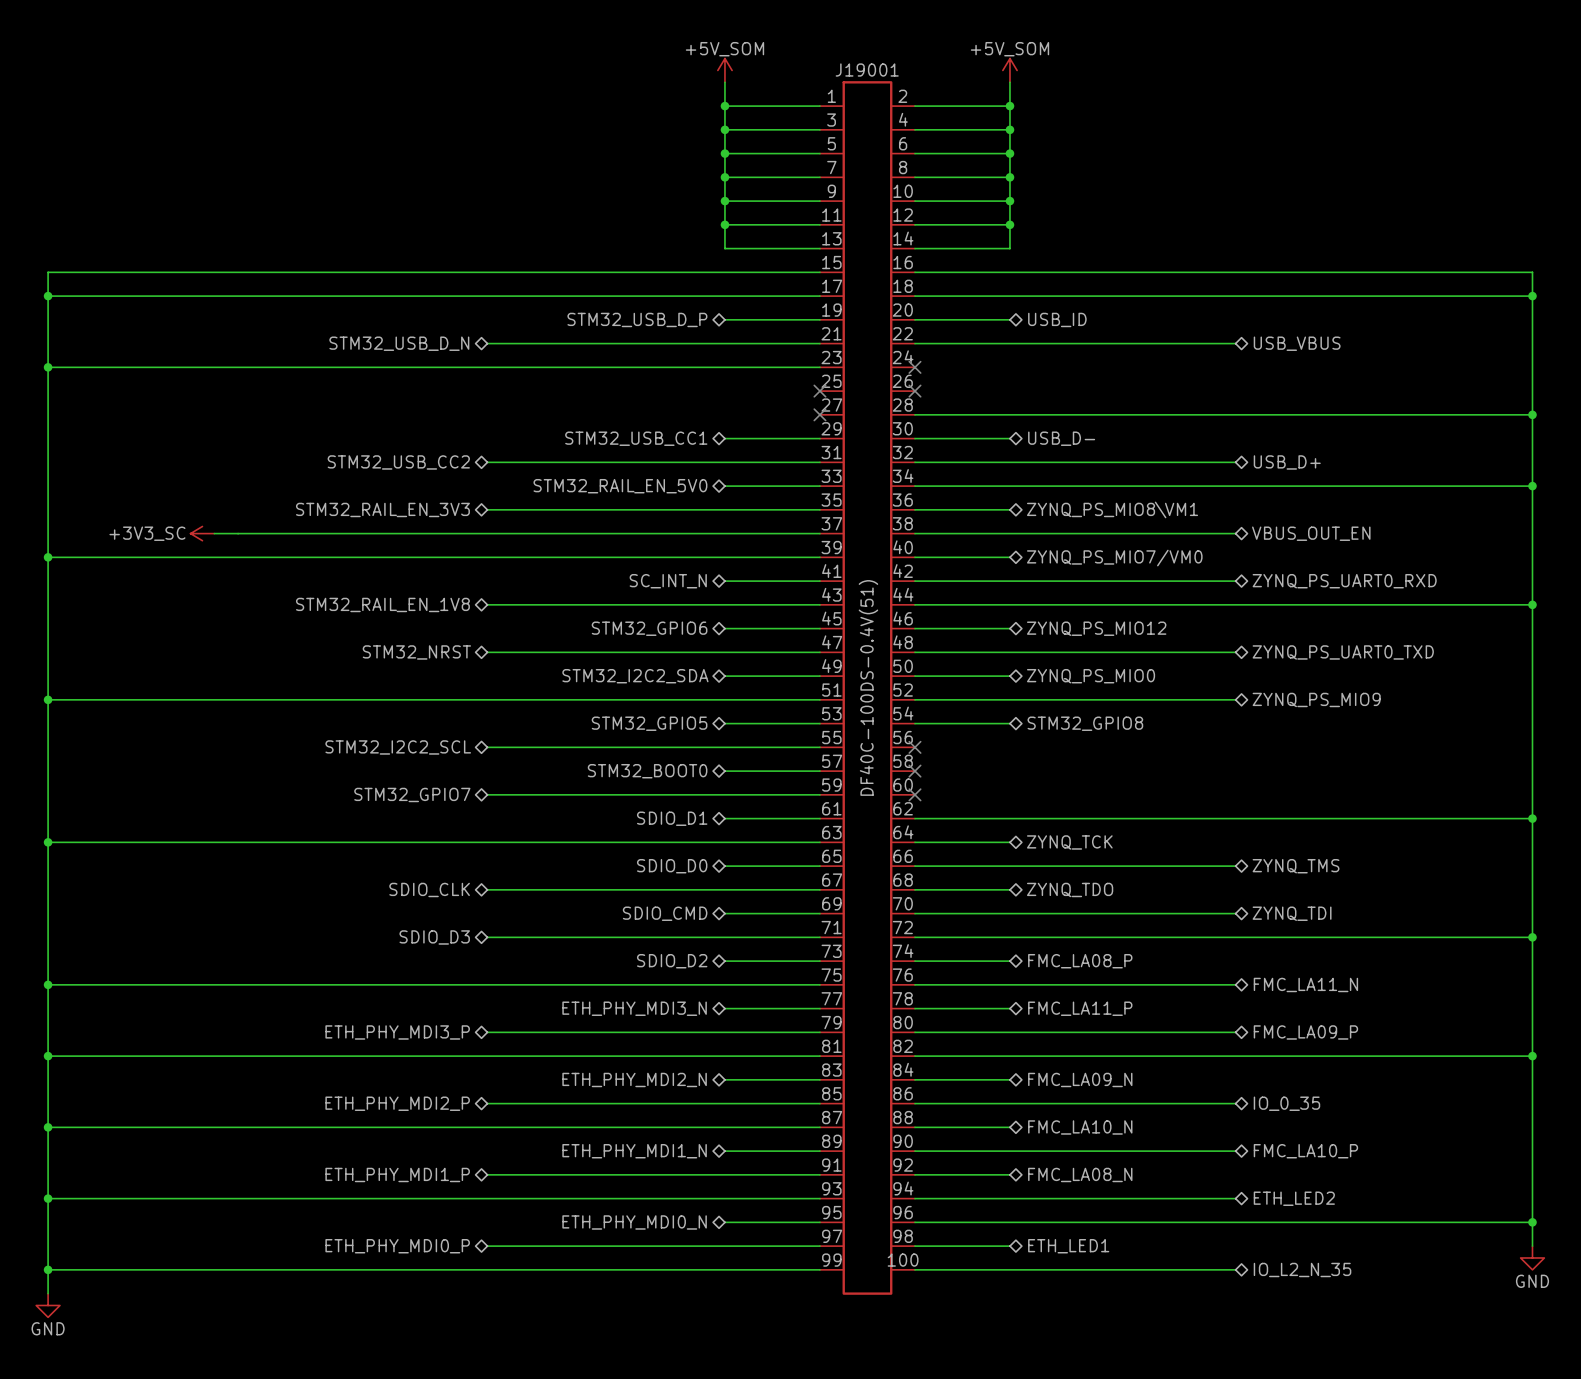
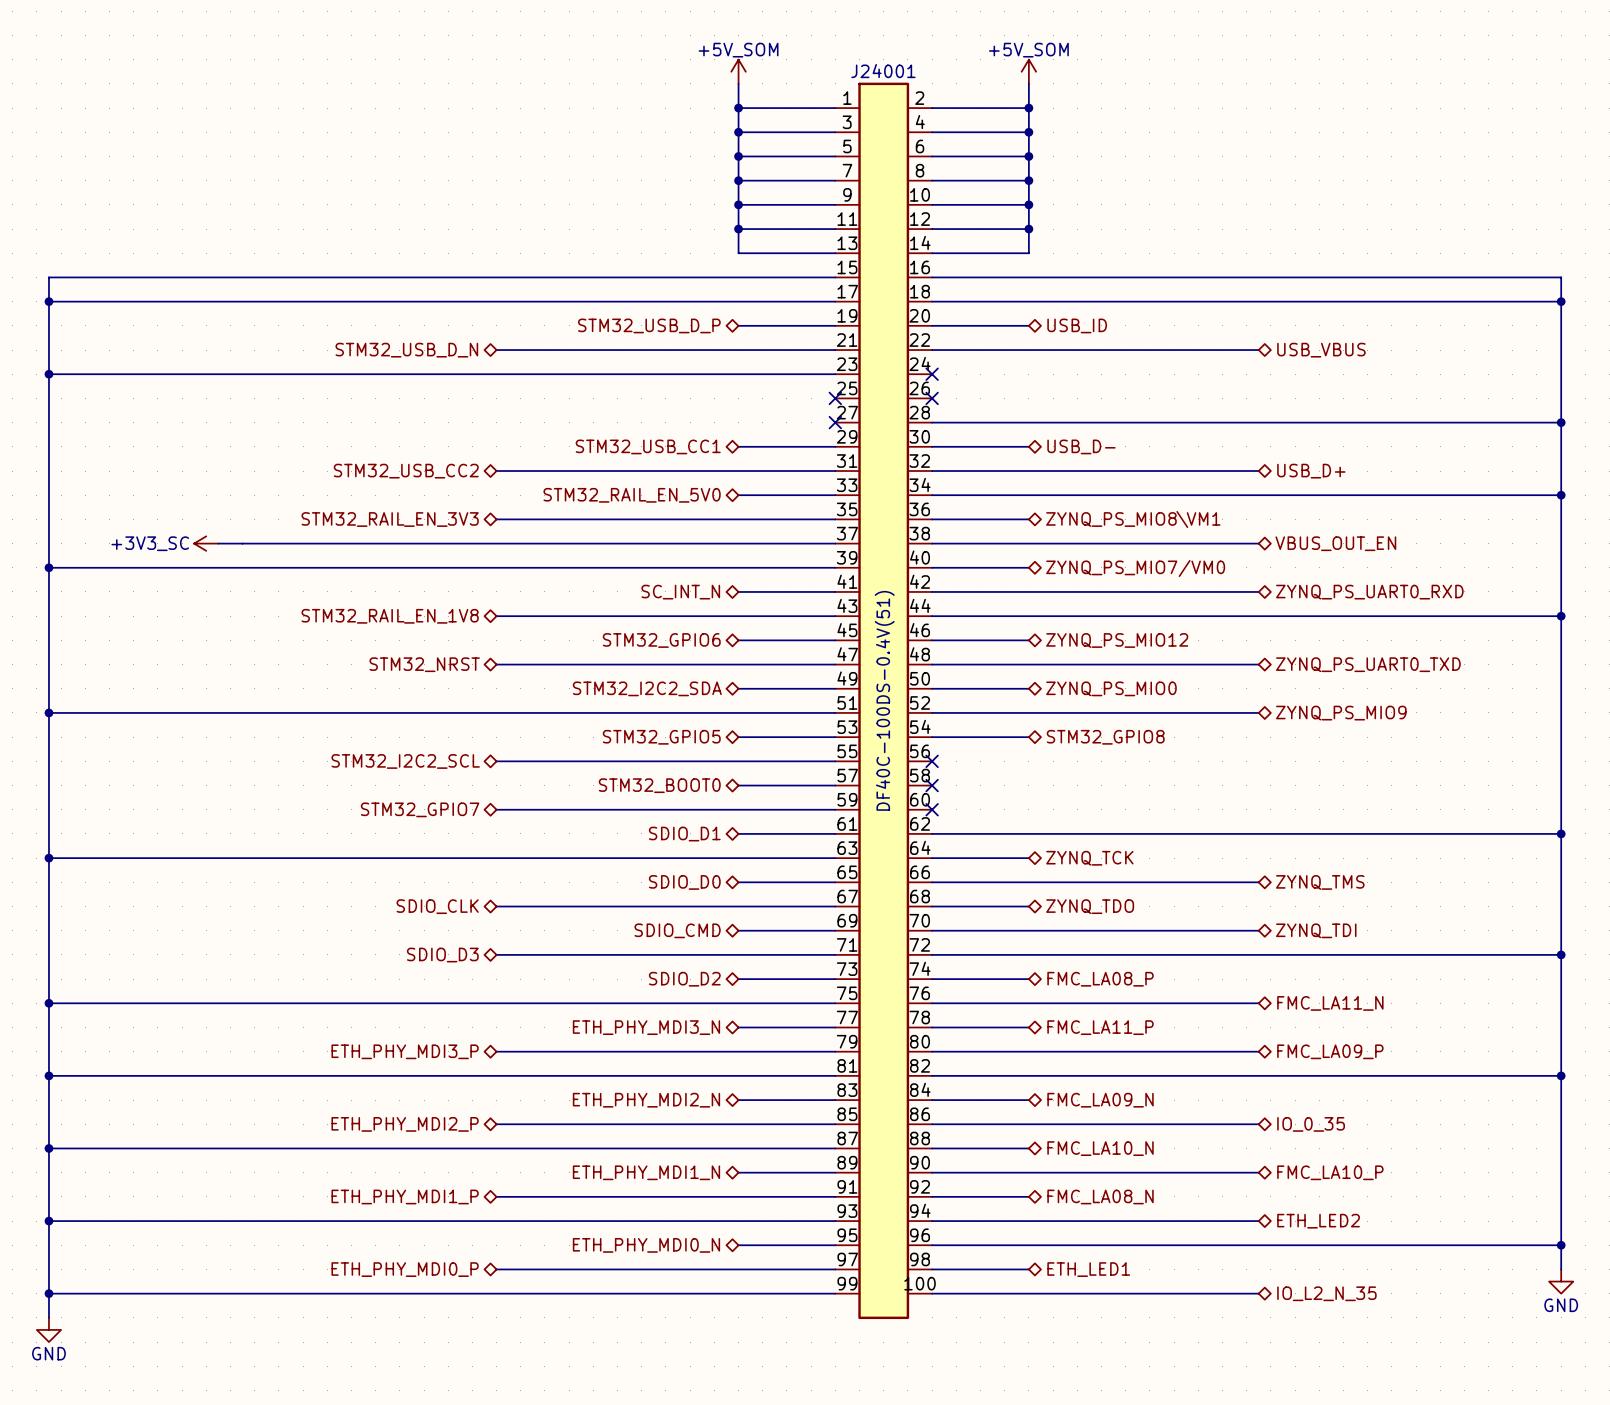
J19001 name: J19001 (867, 70) -> J24001 (883, 71)

